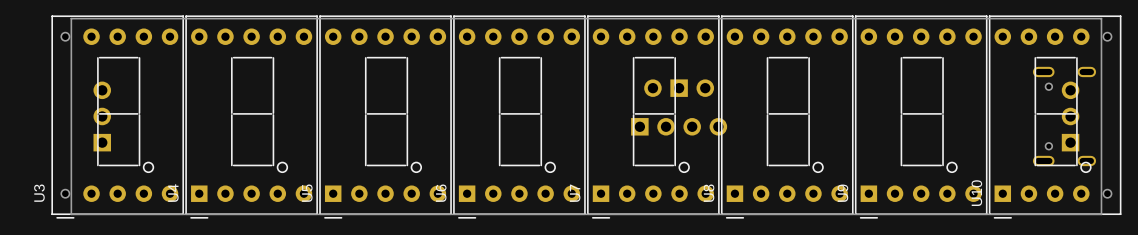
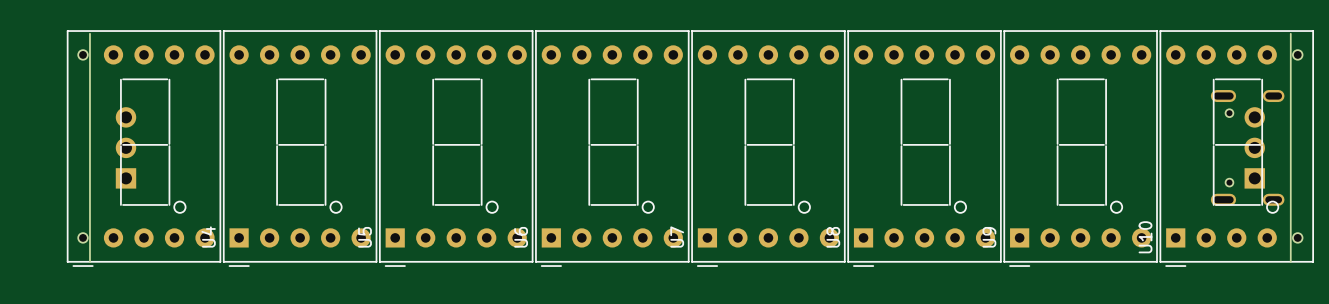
board edge: (71, 18) (1101, 18) -> none
part: (679, 88) -> none
part: (679, 126) -> none
U3 name: U3 (39, 193) -> none
board edge: (71, 214) (1101, 214) -> none

